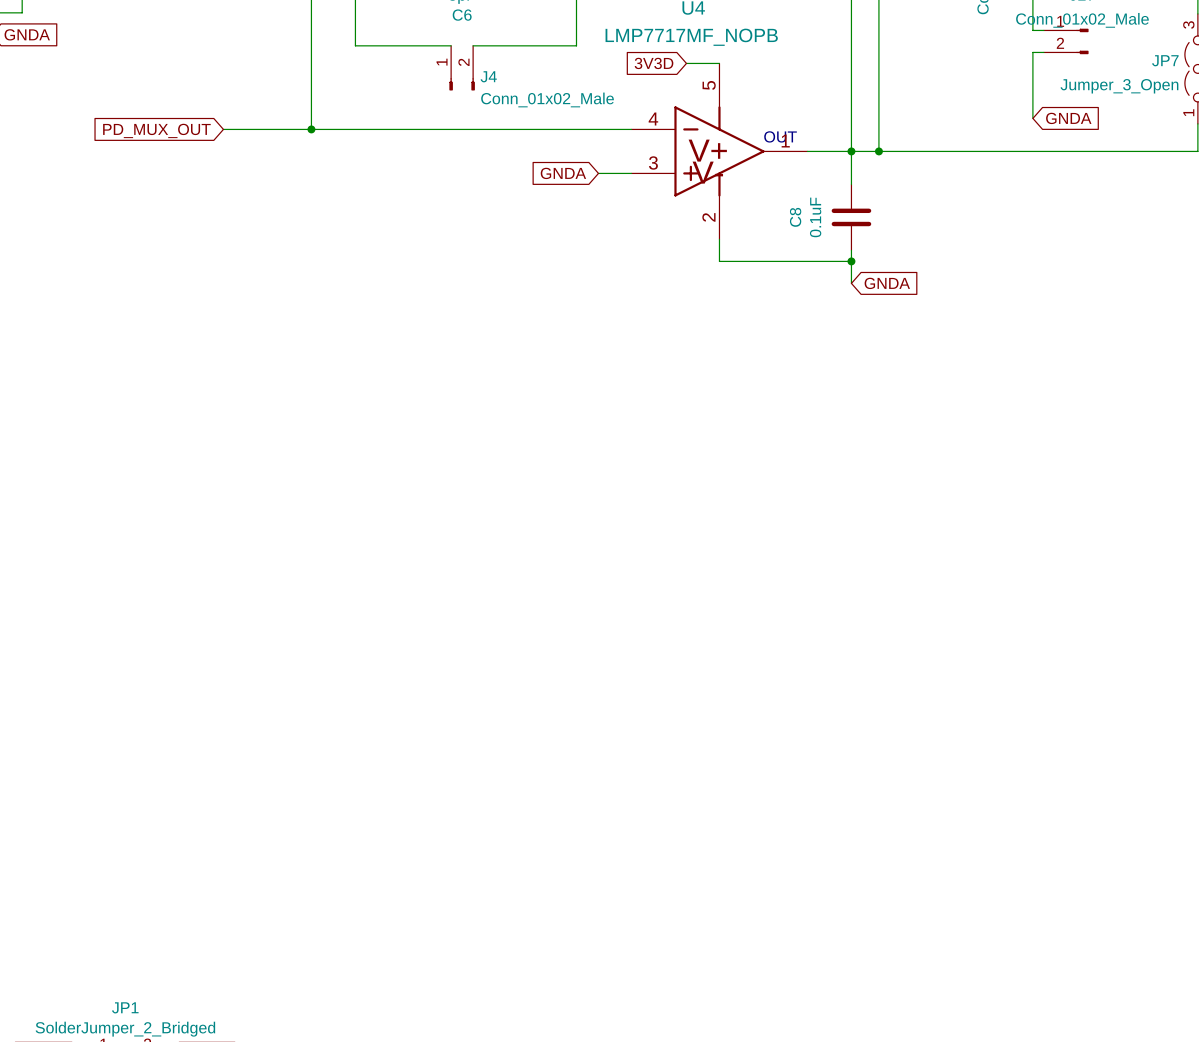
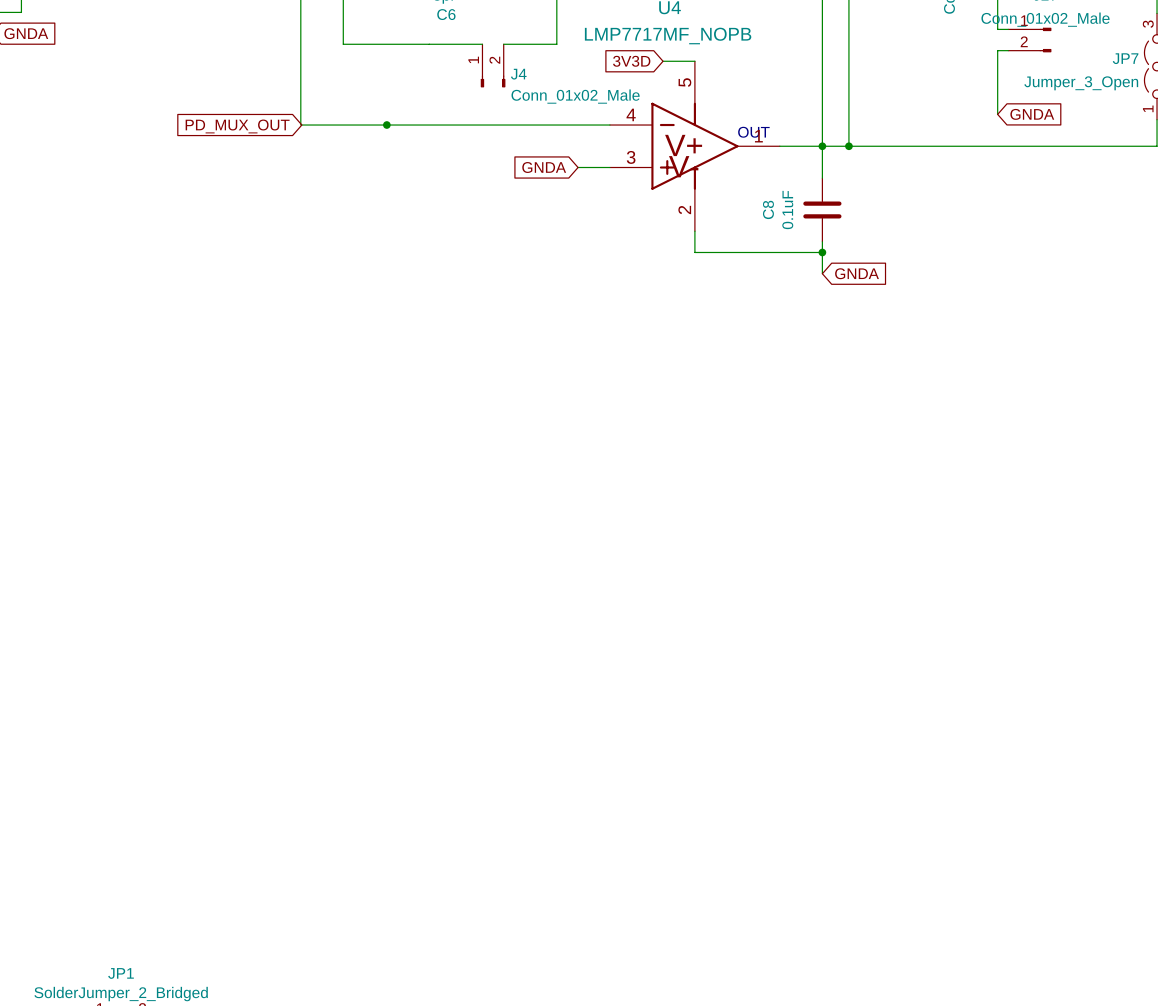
wire: (499, 45) (521, 45) -> (435, 44) (456, 44)
J4 position: (462, 68) -> (493, 65)
wire: (223, 129) (312, 129) -> none
junction: (311, 129) -> none
junction: none -> (386, 125)
global label position: PD_MUX_OUT (156, 130) -> PD_MUX_OUT (237, 126)

